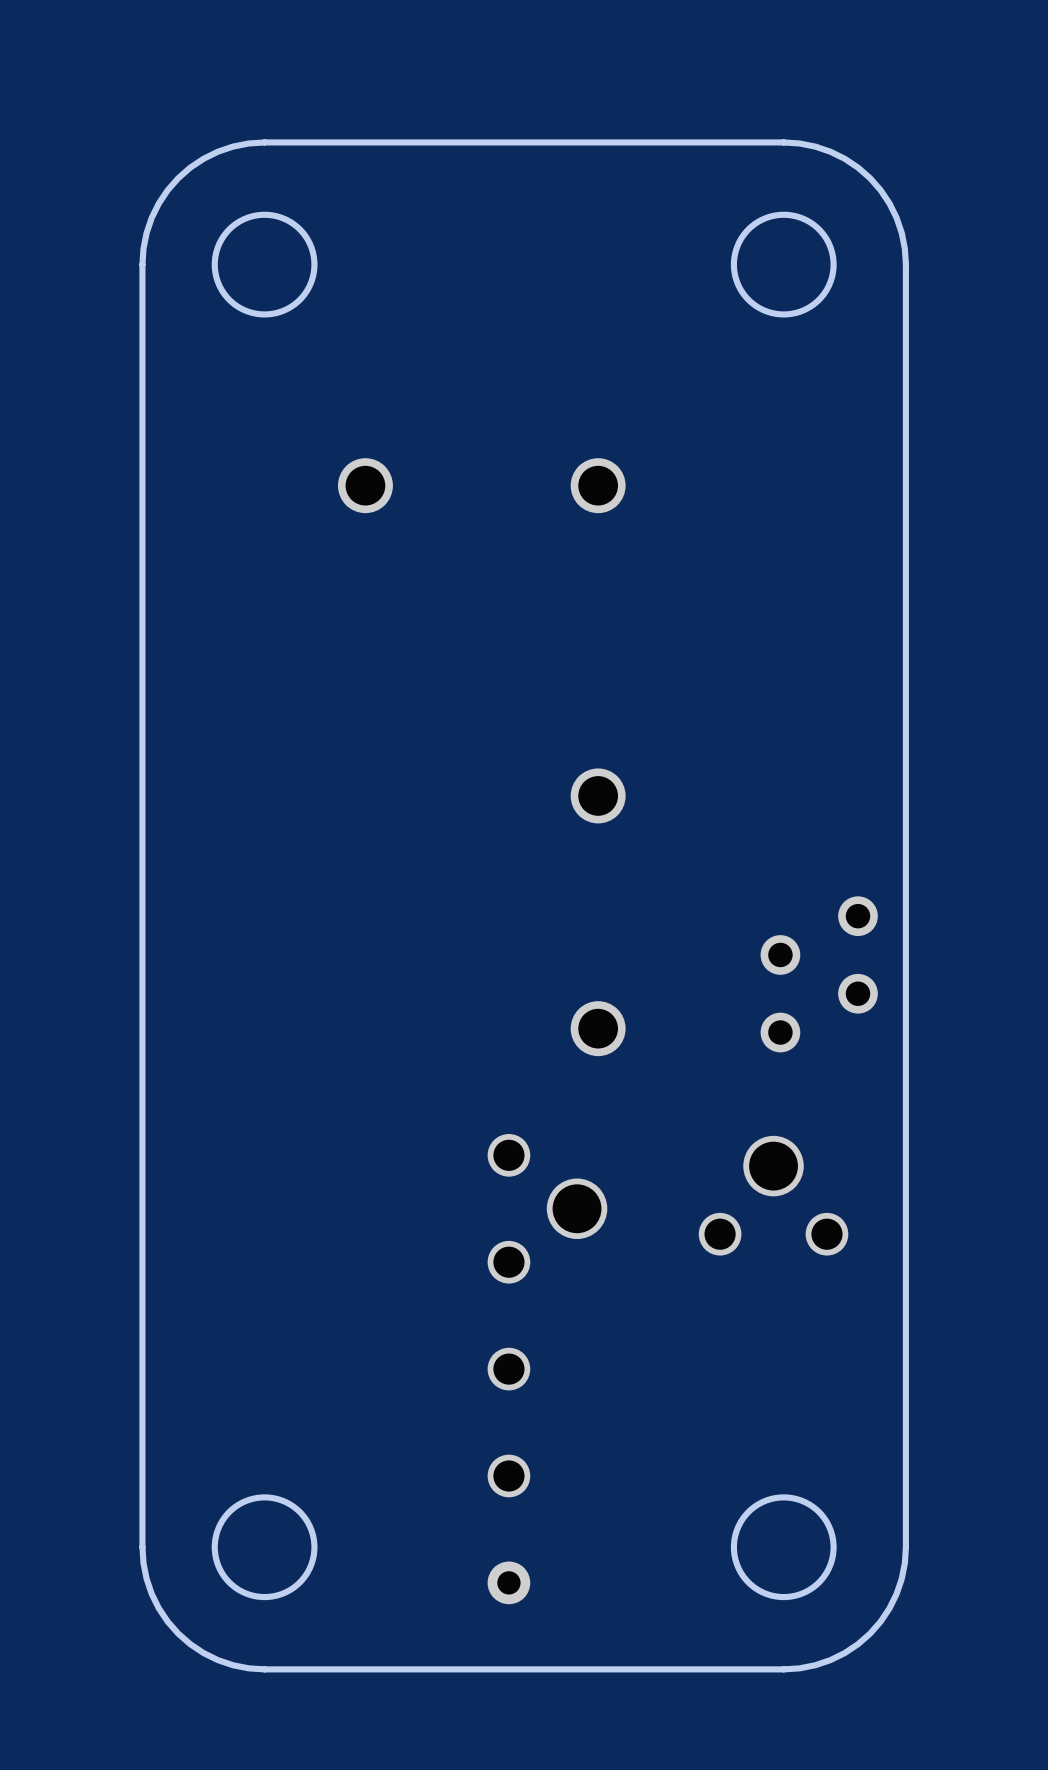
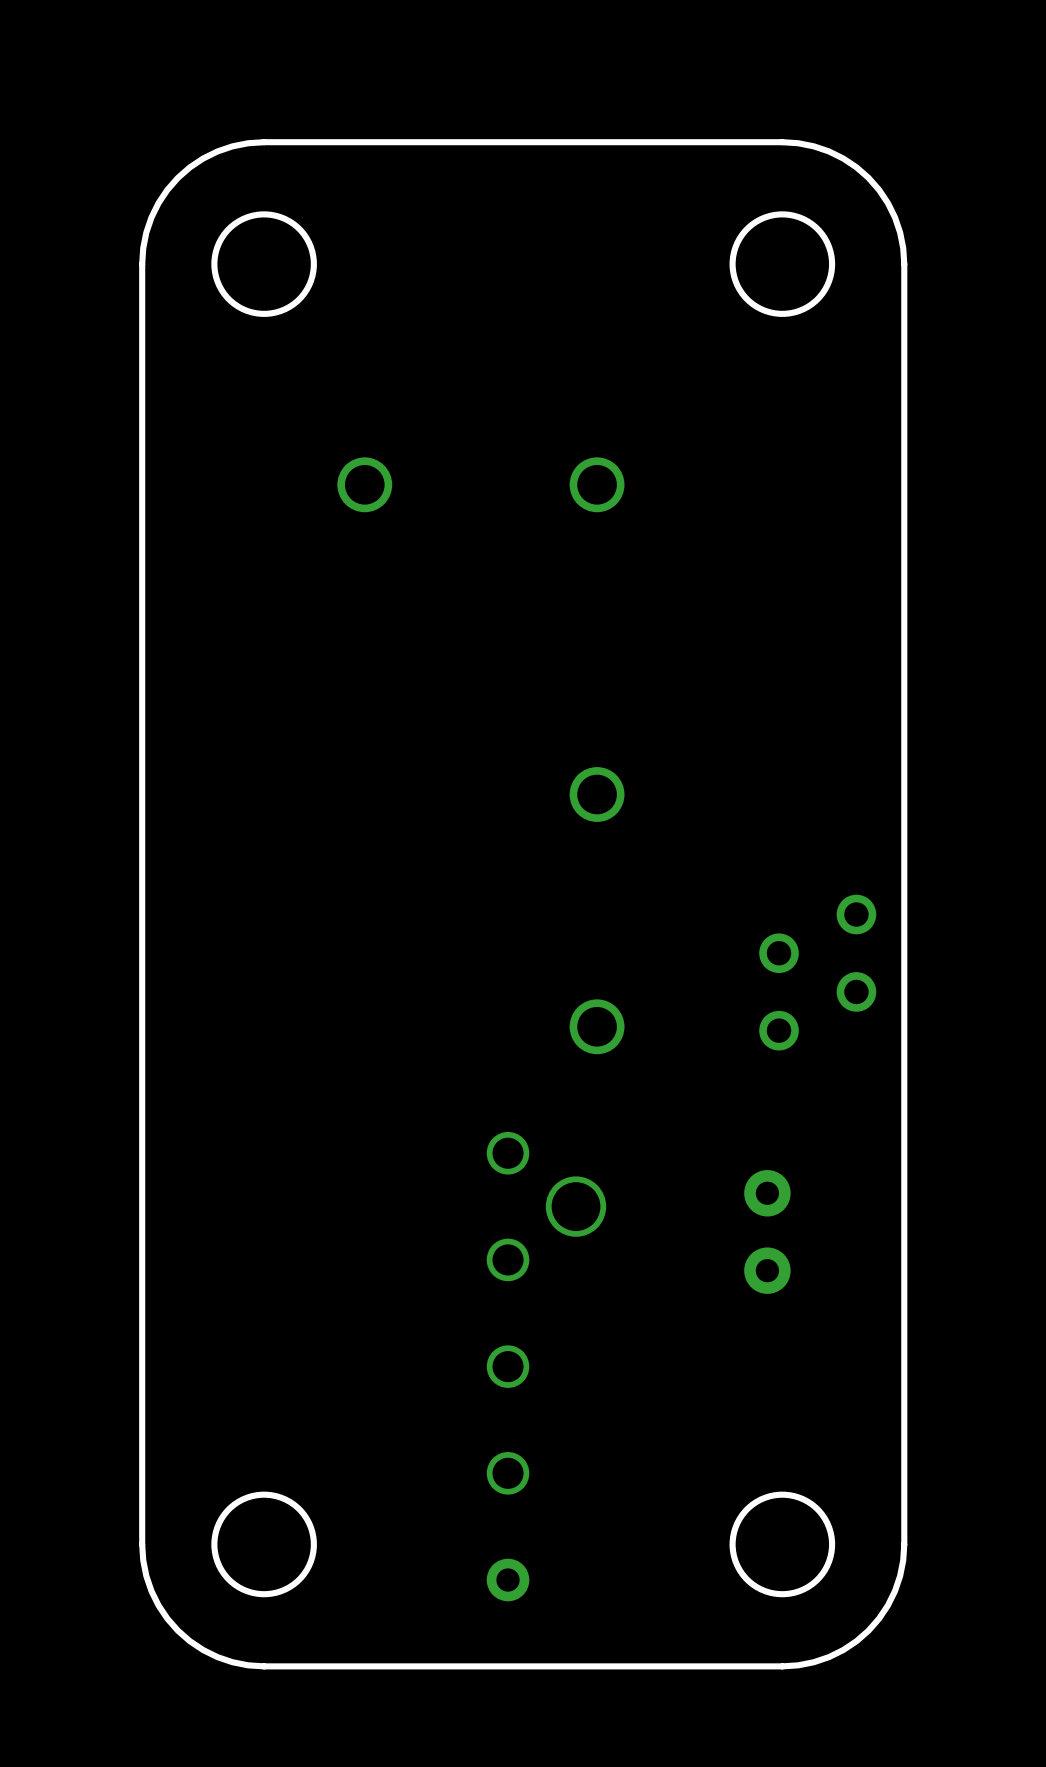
part: (773, 1195) -> none
part: none -> (767, 1231)

